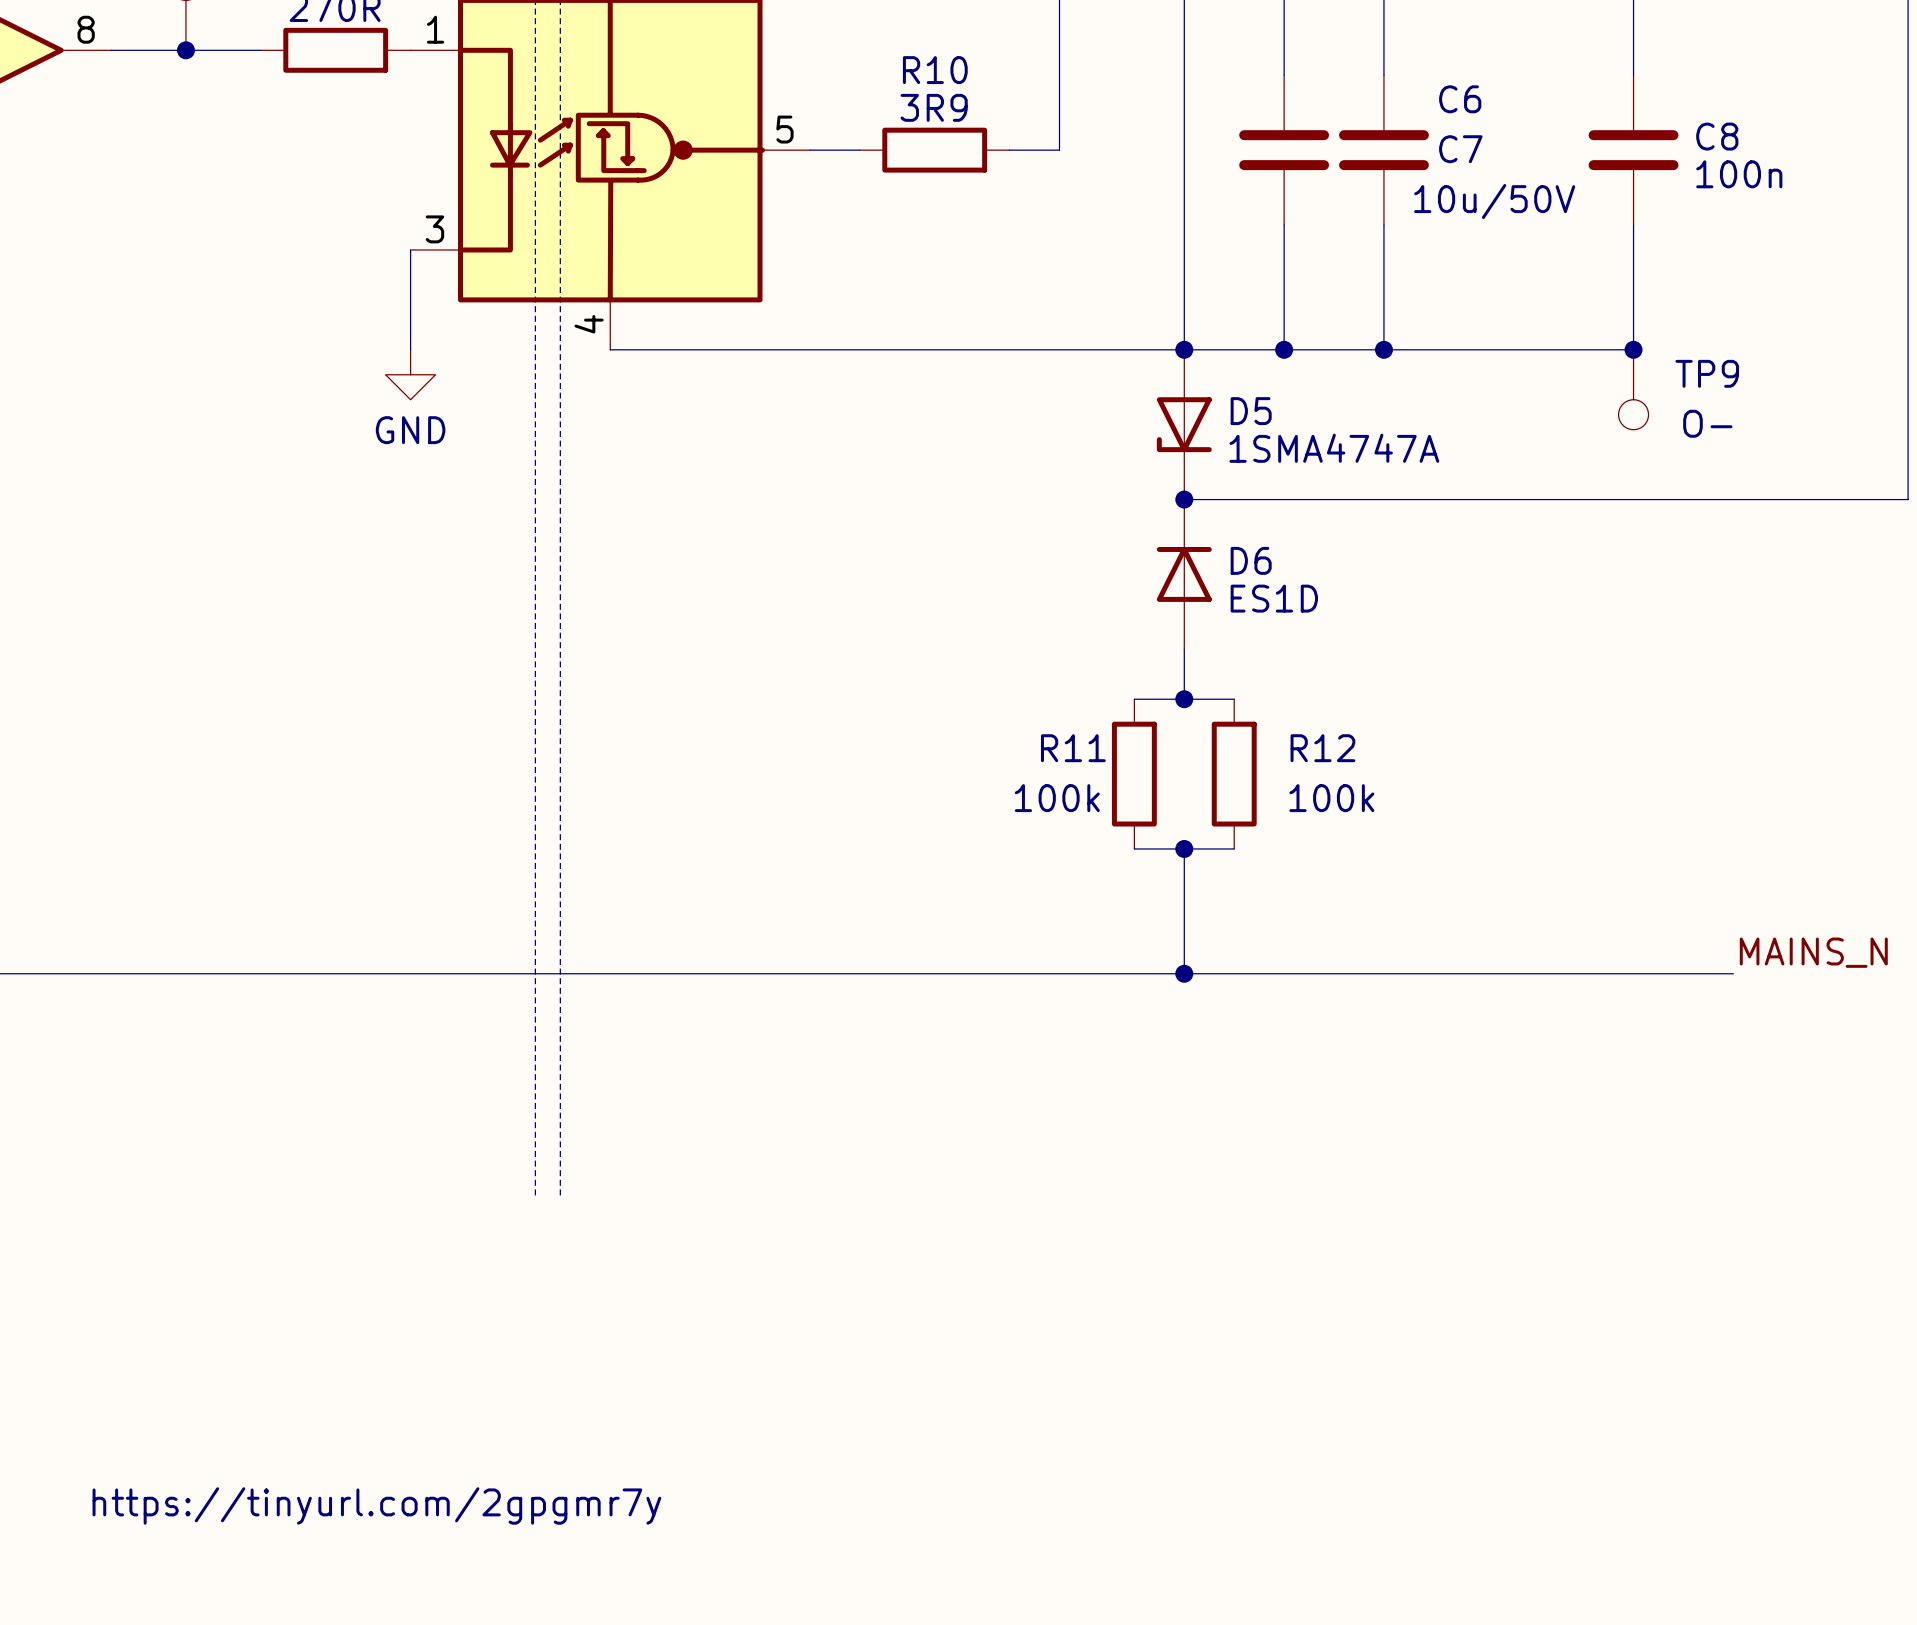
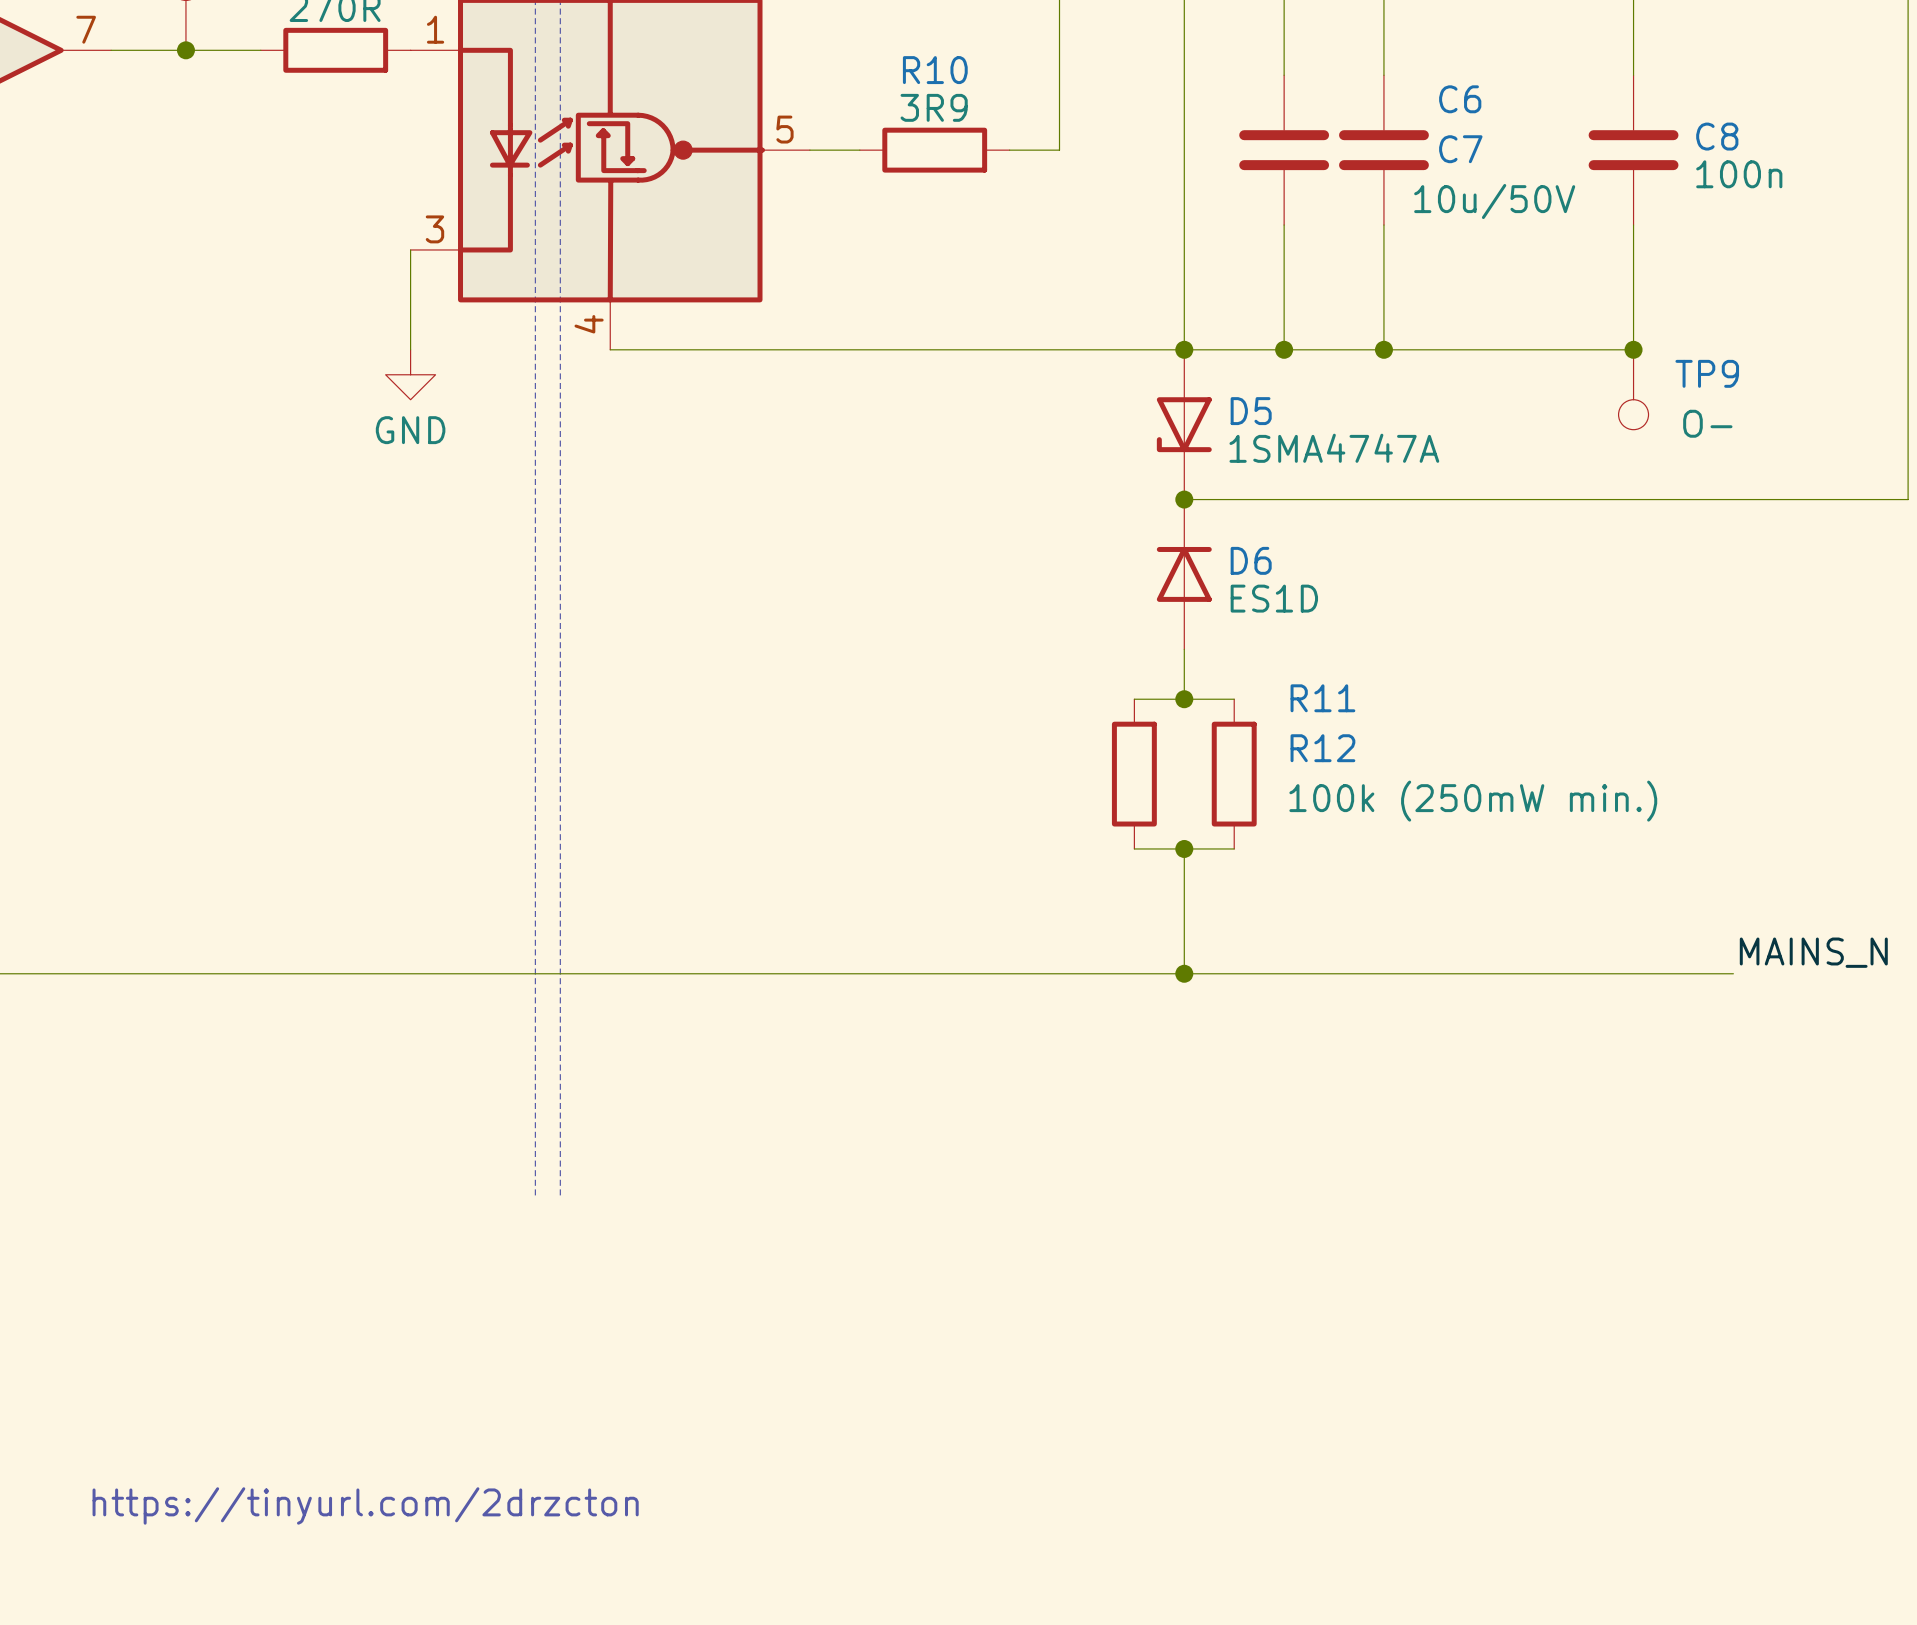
part pin number: 8 (86, 29) -> 7 (86, 29)
R11 name position: R11 (1073, 748) -> R11 (1322, 698)
R11 value: 100k (1057, 798) -> none
R12 value: 100k (1331, 798) -> 100k (250mW min.) (1473, 801)
text: https://tinyurl.com/2gpgmr7y (376, 1505) -> https://tinyurl.com/2drzcton (365, 1505)

